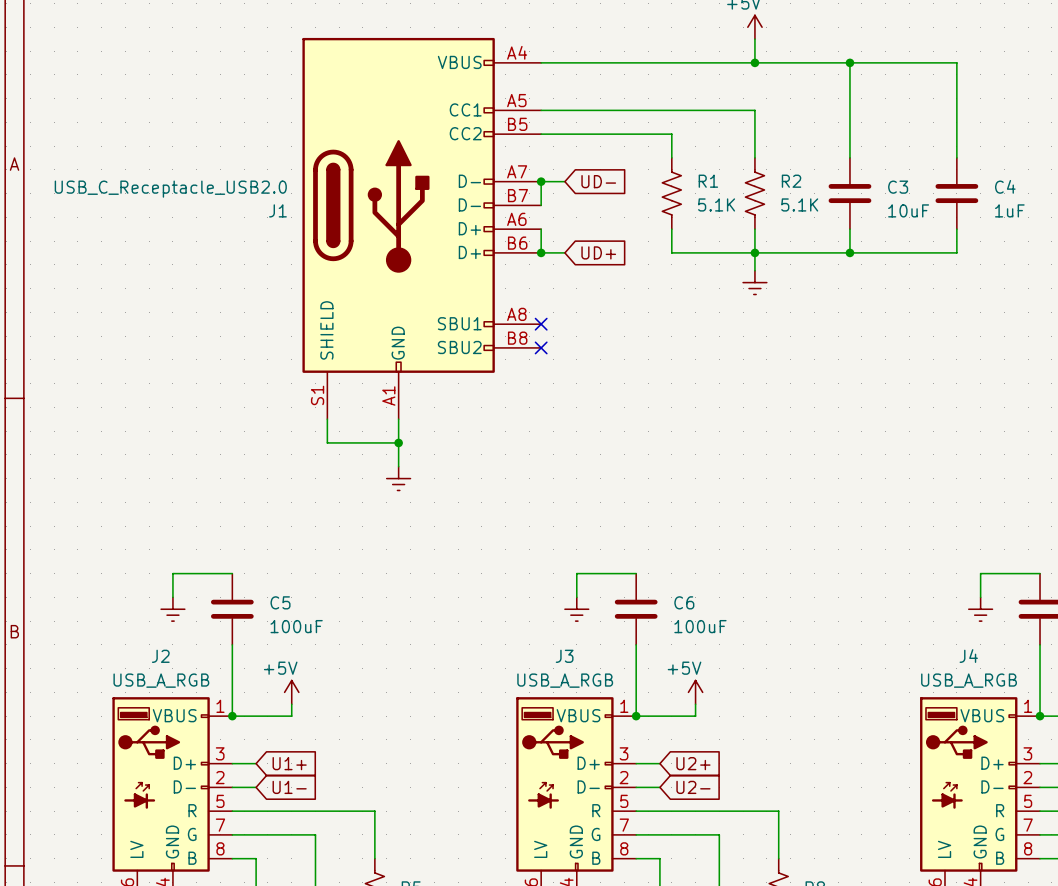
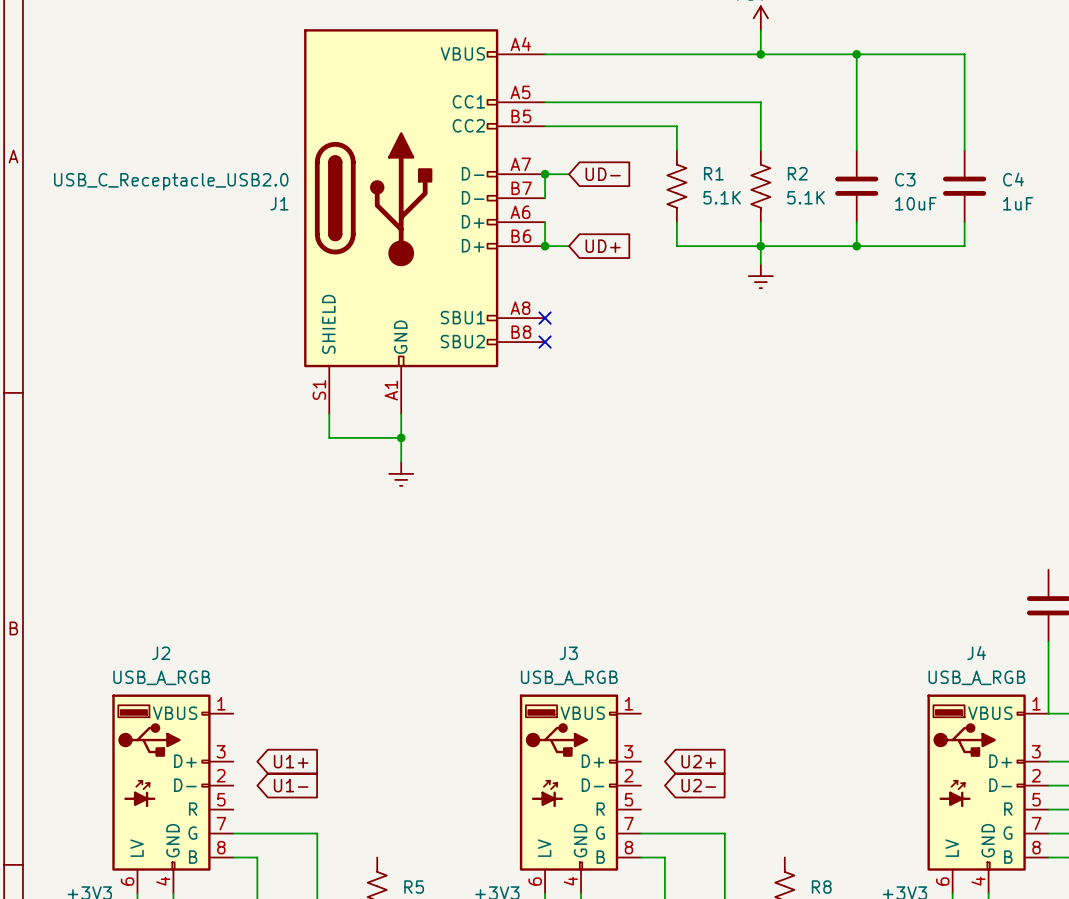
wire: (232, 573) (172, 573) (172, 597) -> none
wire: (636, 573) (576, 573) (576, 597) -> none
wire: (1040, 573) (980, 573) (980, 597) -> none
power symbol: (172, 609) -> none
C5: 100uF (232, 609) -> none
power symbol: (576, 609) -> none
C6: 100uF (636, 609) -> none
power symbol: (980, 609) -> none
wire: (232, 644) (232, 716) (291, 716) (291, 704) -> none
wire: (636, 644) (636, 716) (695, 716) (695, 704) -> none
power symbol: +5V (291, 692) -> none
power symbol: +5V (695, 692) -> none
junction: (232, 716) -> none
junction: (636, 716) -> none
junction: (1040, 716) -> none
wire: (232, 763) (256, 763) -> none
wire: (636, 763) (659, 763) -> none
wire: (232, 787) (256, 787) -> none
wire: (636, 787) (659, 787) -> none
wire: (232, 811) (374, 811) (374, 858) -> none
wire: (636, 811) (778, 811) (778, 858) -> none

